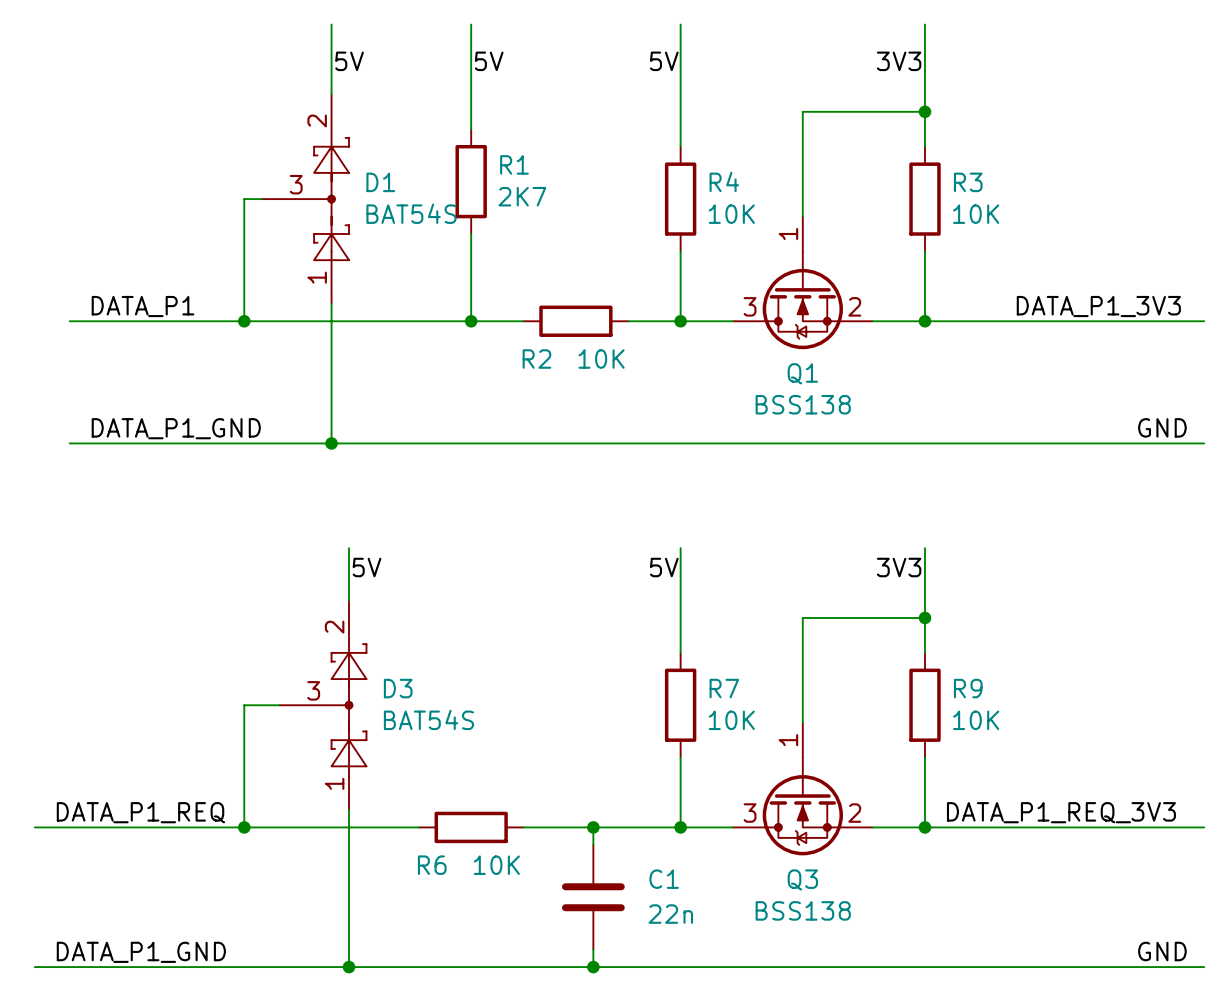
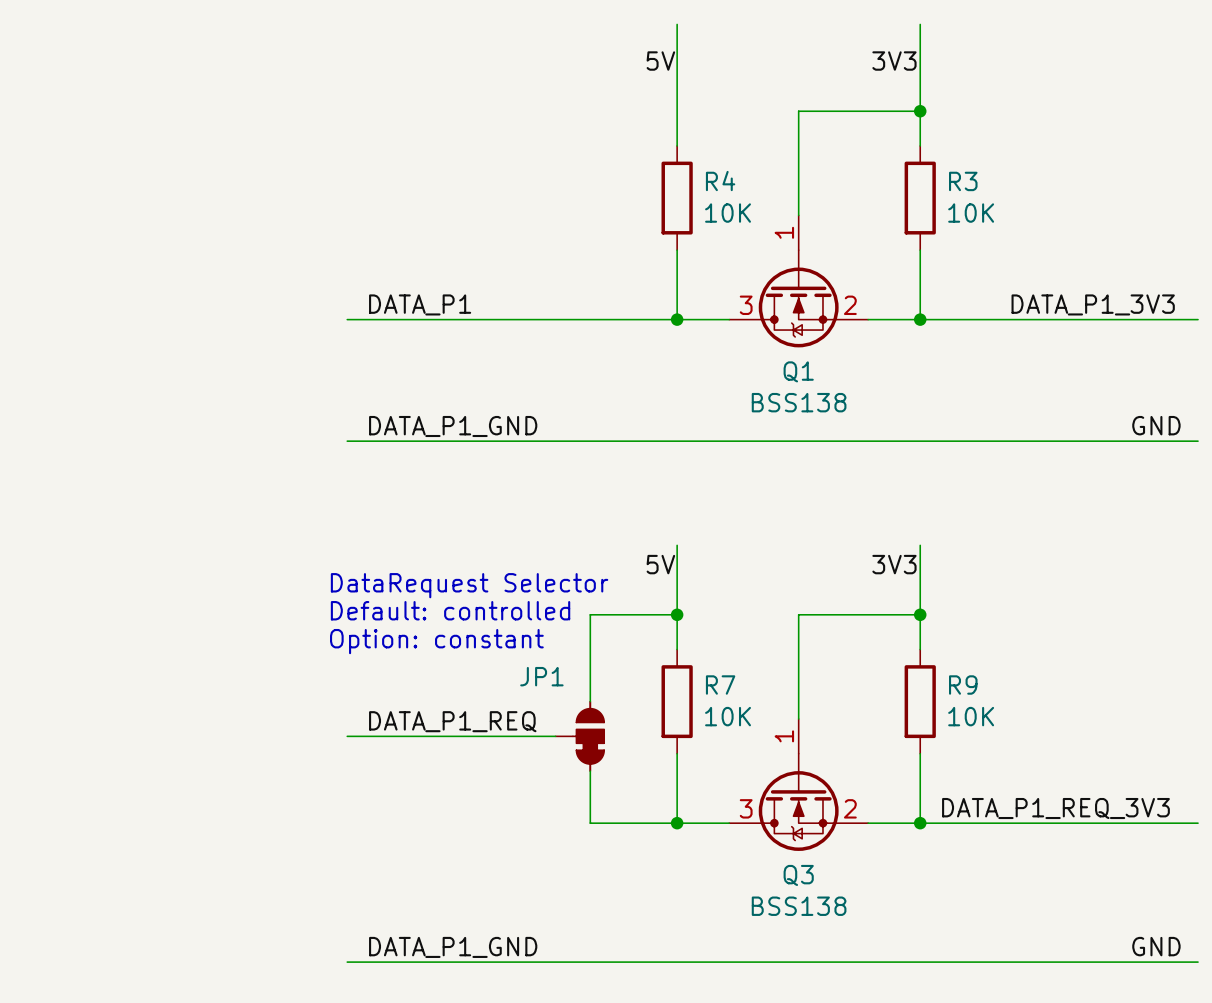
wire: (331, 24) (331, 94) -> none
wire: (471, 24) (471, 129) -> none
label: 5V (349, 61) -> none
label: 5V (489, 61) -> none
R1: 2K7 (471, 181) -> none
wire: (261, 199) (244, 199) (244, 321) -> none
D1: BAT54S (305, 199) -> none
wire: (471, 233) (471, 321) -> none
wire: (331, 303) (331, 443) -> none
label position: DATA_P1 (143, 306) -> DATA_P1 (420, 304)
wire: (69, 321) (349, 321) -> none
junction: (244, 321) -> none
junction: (471, 321) -> none
wire: none -> (520, 319) (625, 319)
R2: 10K (575, 321) -> none
label position: DATA_P1_GND (176, 428) -> DATA_P1_GND (453, 426)
wire: (69, 443) (349, 443) -> none
junction: (331, 443) -> none
wire: (349, 548) (349, 600) -> (590, 771) (590, 823)
label: 5V (367, 567) -> none
text: none -> DataRequest Selector (469, 585)
text: none -> Default: controlled (450, 610)
wire: none -> (677, 614) (590, 614) (590, 701)
junction: none -> (677, 614)
text: none -> Option: constant (436, 641)
wire: (279, 705) (244, 705) (244, 827) -> none
D3: BAT54S (322, 705) -> none
wire: none -> (347, 736) (555, 736)
JP1: none -> (579, 736)
wire: (349, 809) (349, 967) (34, 967) -> none
label position: DATA_P1_REQ (140, 812) -> DATA_P1_REQ (452, 721)
wire: (34, 827) (418, 827) -> none
junction: (244, 827) -> none
R6: 10K (471, 827) -> none
wire: (523, 827) (593, 827) (593, 844) -> none
junction: (593, 827) -> none
C1: 22n (593, 897) -> none
wire: (593, 949) (593, 967) -> none
label: DATA_P1_GND (141, 952) -> none
label: none -> DATA_P1_GND (453, 947)
junction: (349, 967) -> none
junction: (593, 967) -> none

